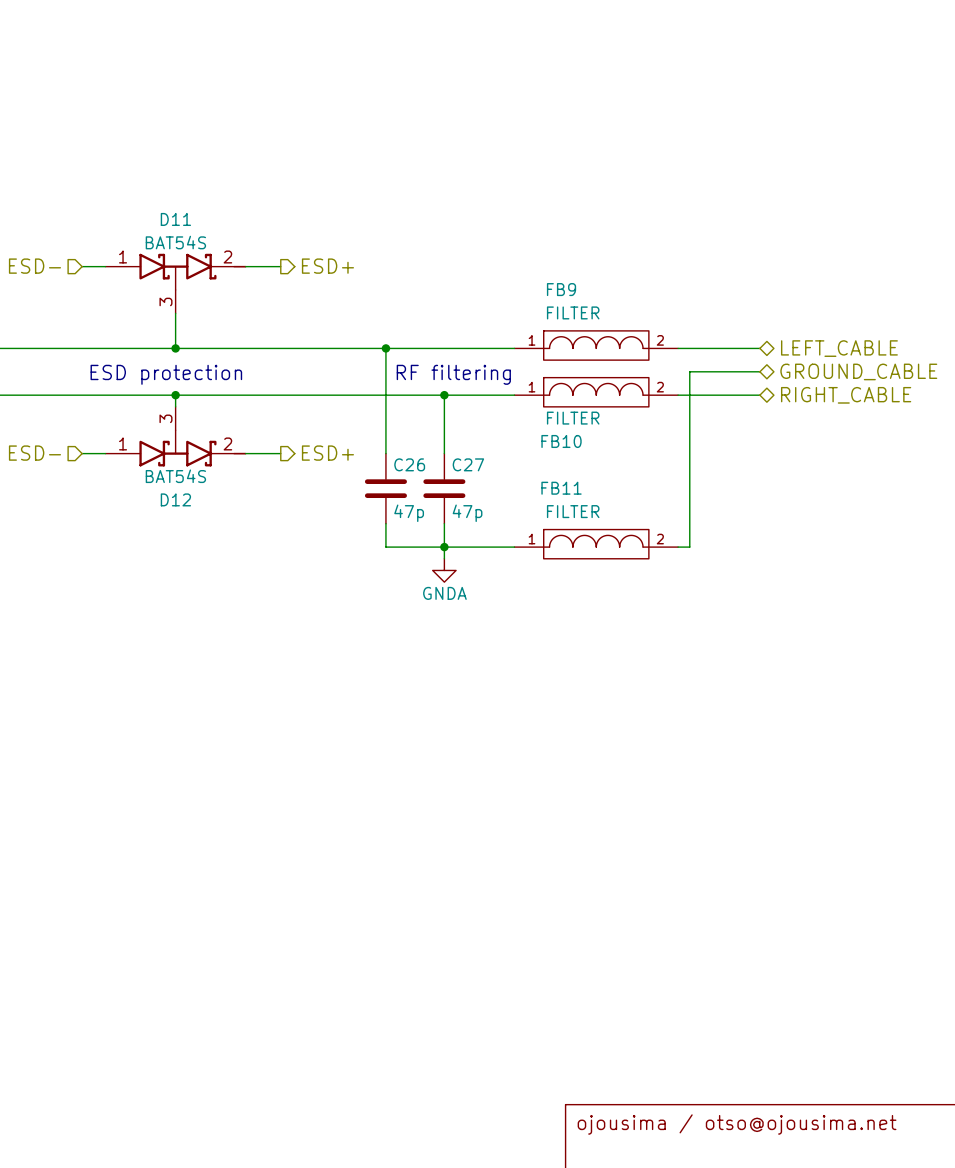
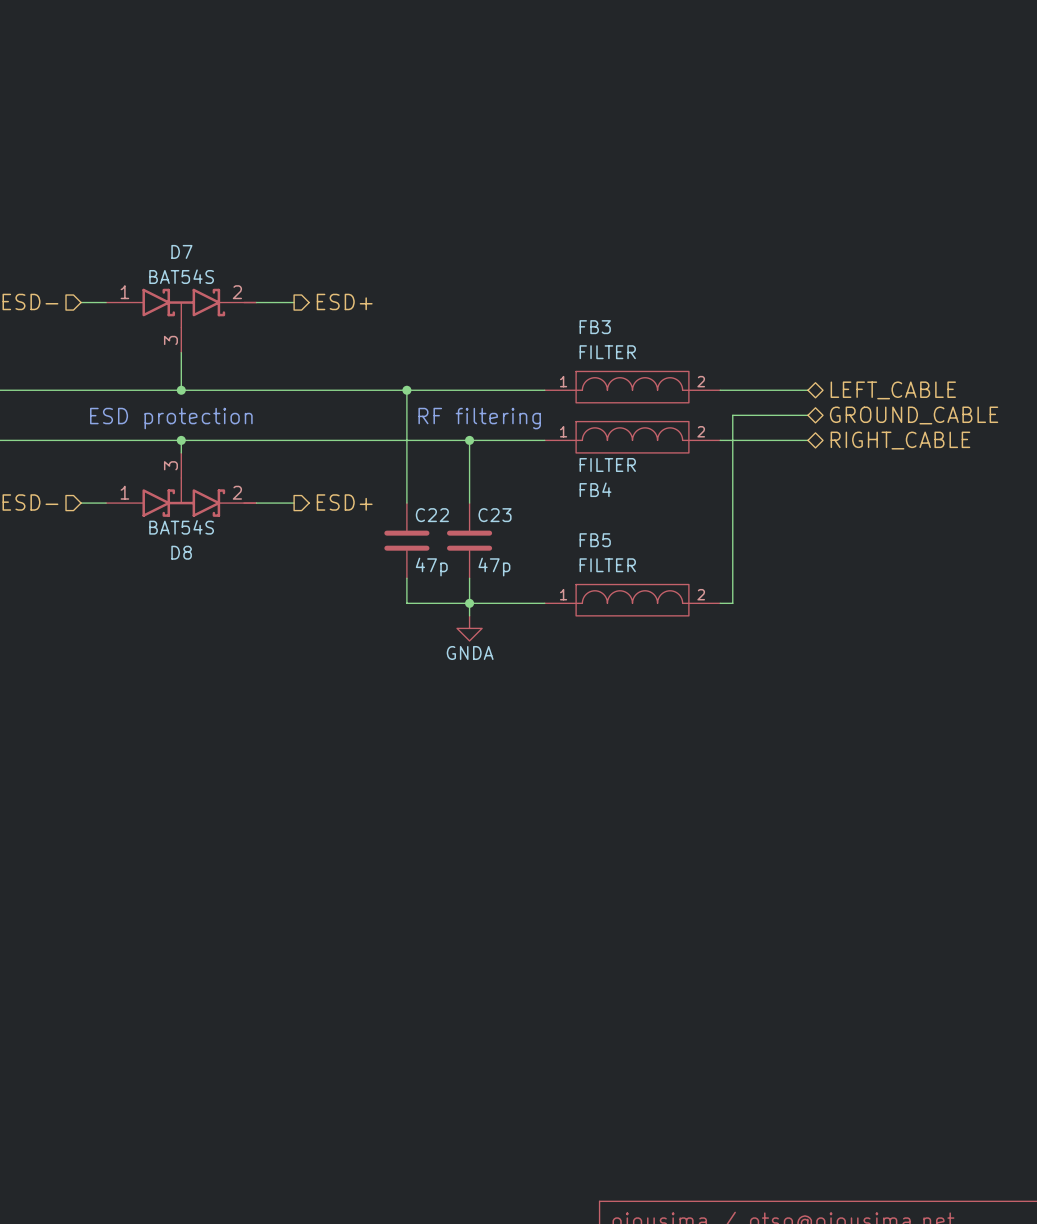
D11 name: D11 (175, 219) -> D7 (181, 251)
FB9 name: FB9 (561, 289) -> FB3 (595, 327)
FB10 name: FB10 (561, 441) -> FB4 (595, 489)
C26 name: C26 (409, 464) -> C22 (432, 515)
C27 name: C27 (468, 464) -> C23 (495, 515)
FB11 name: FB11 (561, 488) -> FB5 (595, 540)
D12 name: D12 (175, 499) -> D8 (181, 552)

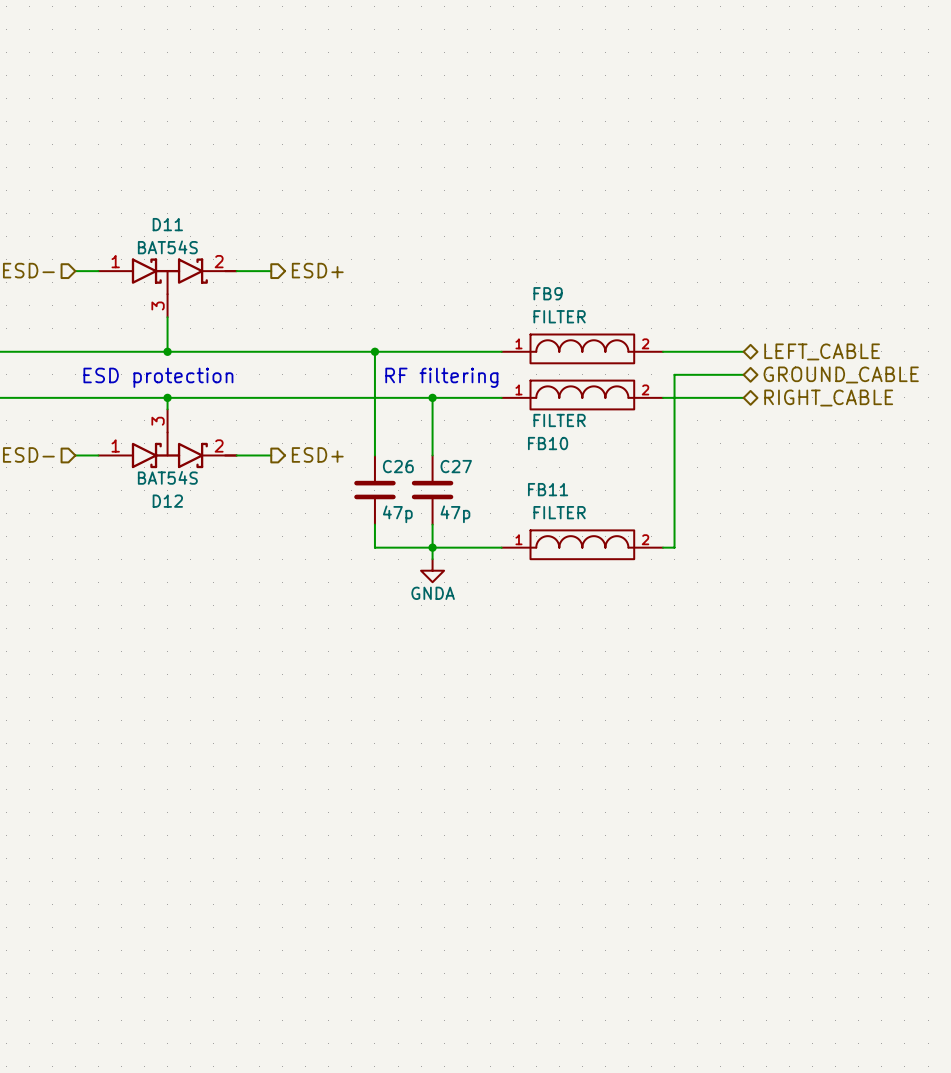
D7 name: D7 (181, 251) -> D11 (167, 224)
FB3 name: FB3 (595, 327) -> FB9 (548, 293)
FB4 name: FB4 (595, 489) -> FB10 (548, 443)
C22 name: C22 (432, 515) -> C26 (398, 466)
C23 name: C23 (495, 515) -> C27 (456, 466)
FB5 name: FB5 (595, 540) -> FB11 (548, 489)
D8 name: D8 (181, 552) -> D12 (167, 501)

